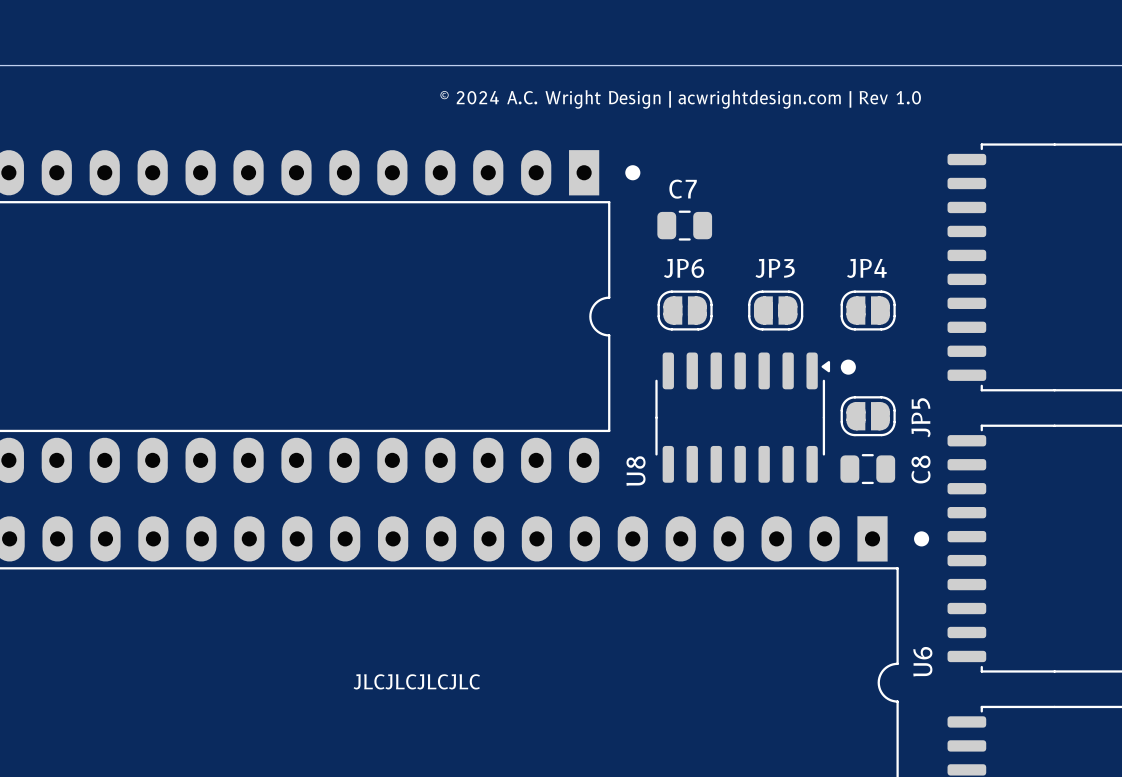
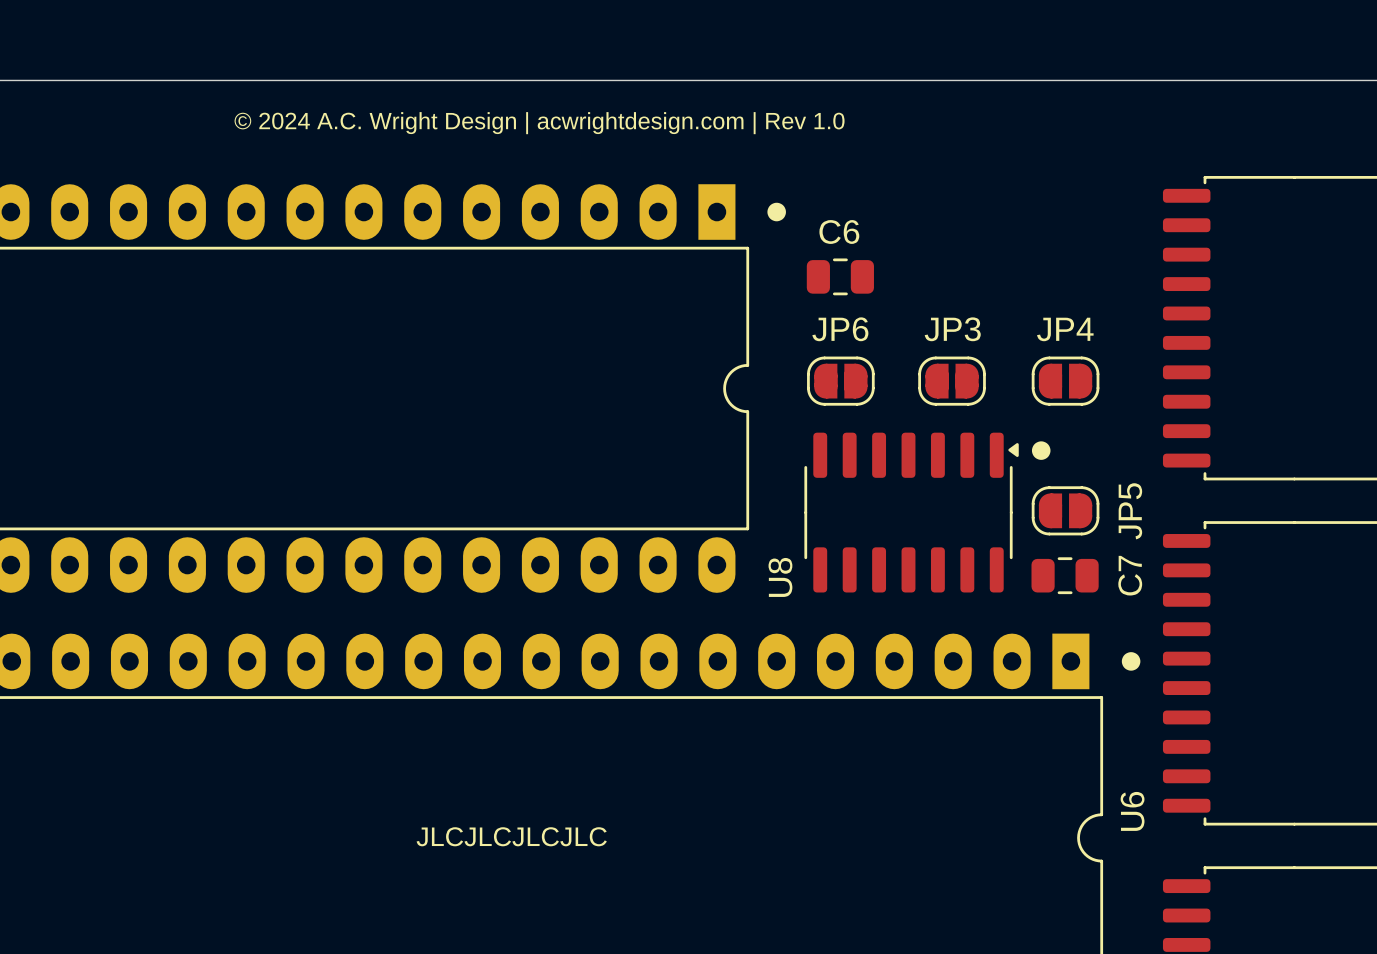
text position: © 2024 A.C. Wright Design | acwrightdesign.com | Rev 1.0 (680, 99) -> © 2024 A.C. Wright Design | acwrightdesign.com | Rev 1.0 (539, 123)
C7 name: C7 (683, 189) -> C6 (839, 231)
C8 name: C8 (920, 469) -> C7 (1130, 575)

